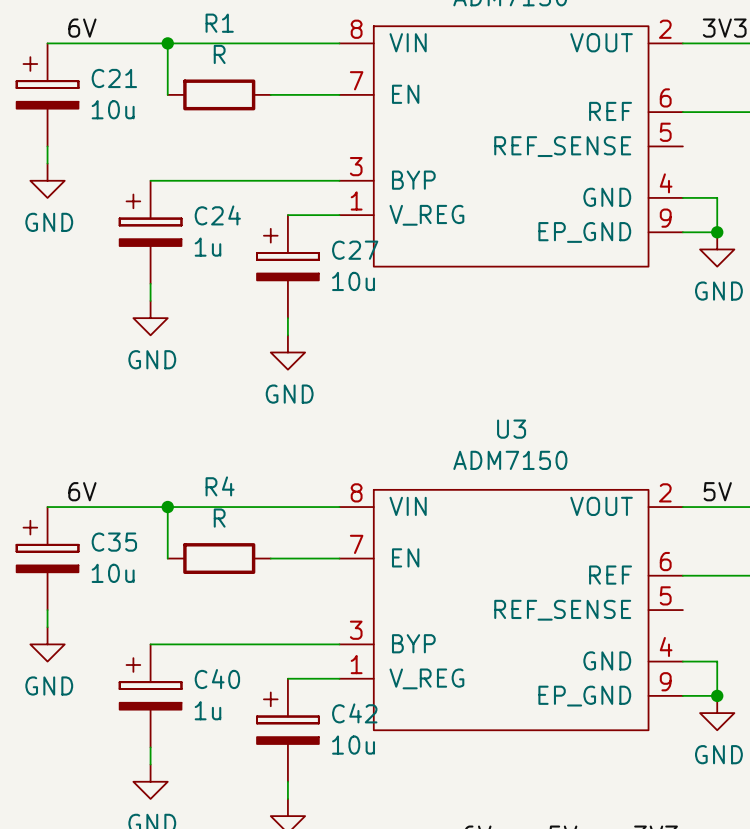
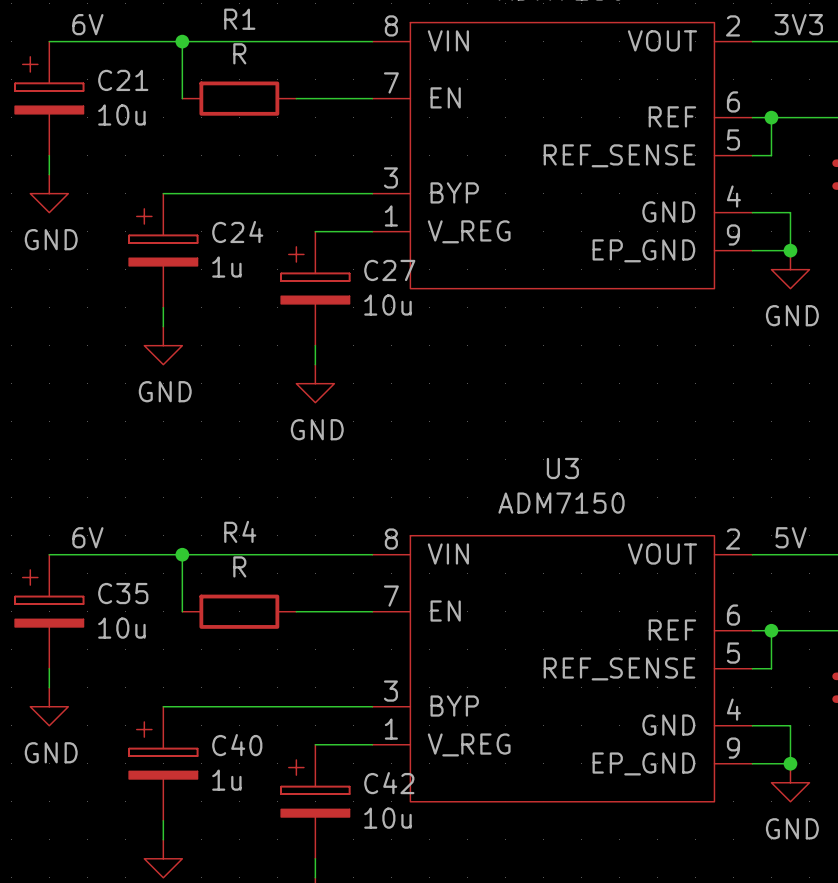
wire: none -> (771, 117) (771, 155) (752, 155)
junction: none -> (771, 117)
wire: none -> (771, 630) (771, 668) (752, 668)
junction: none -> (771, 630)

